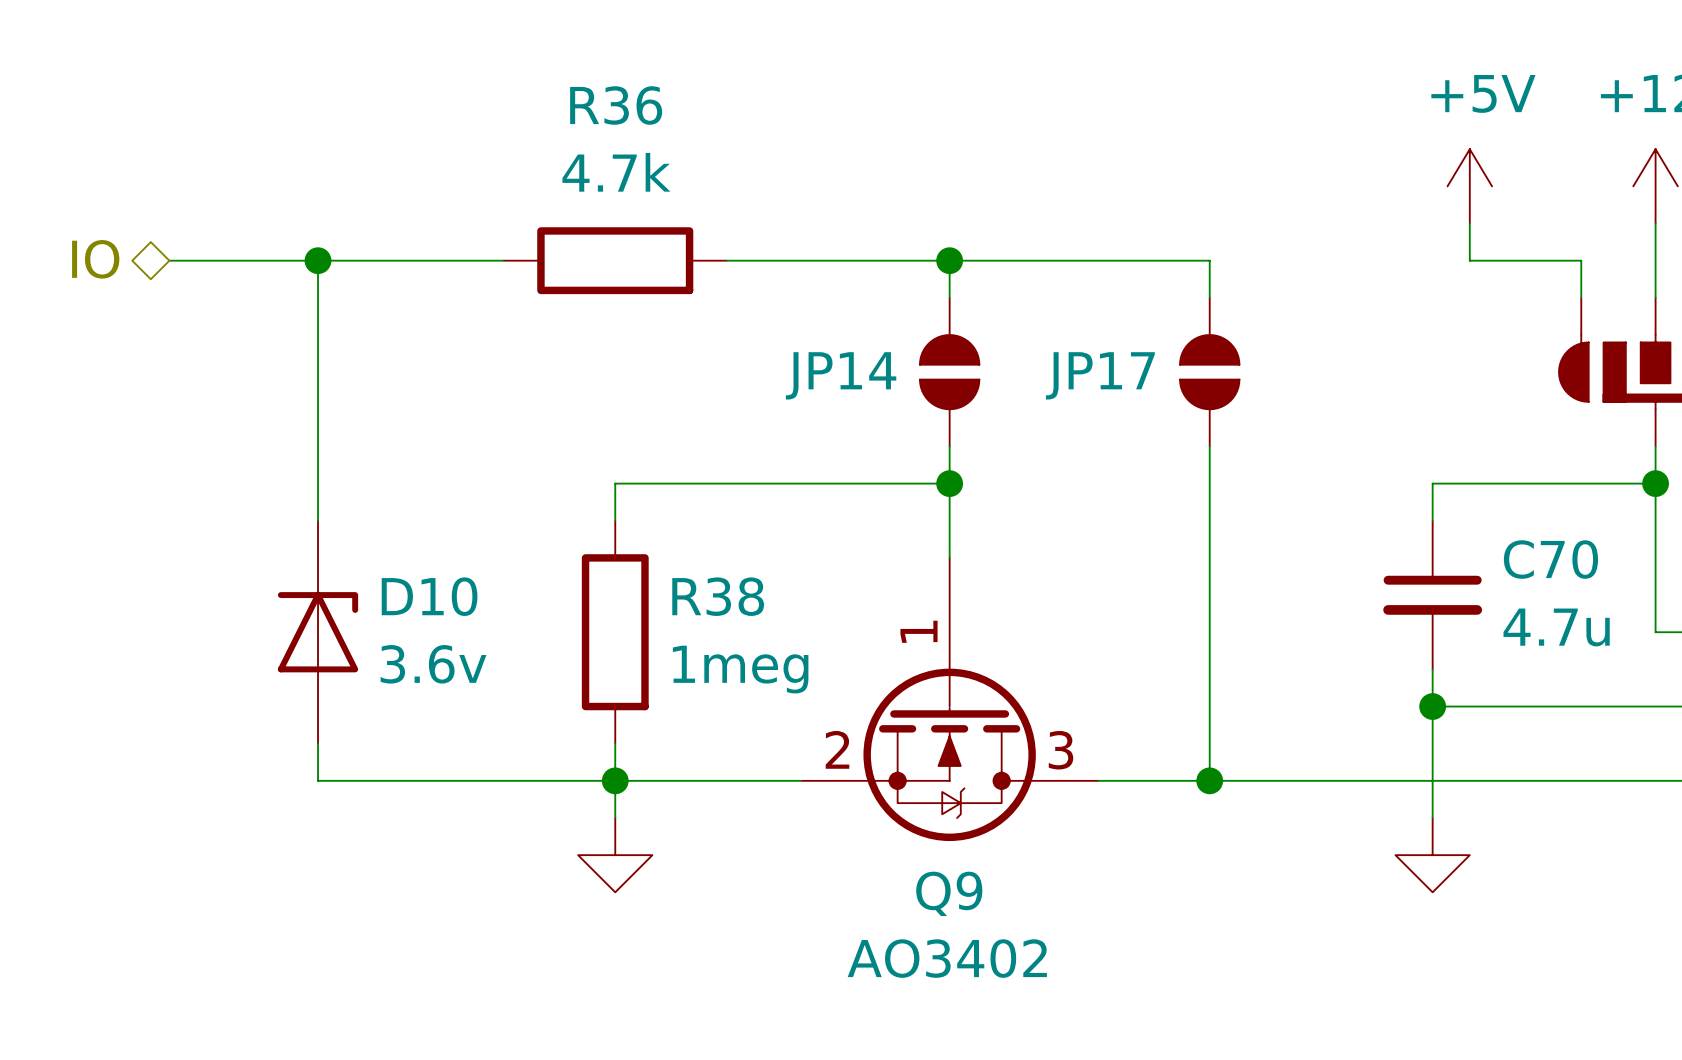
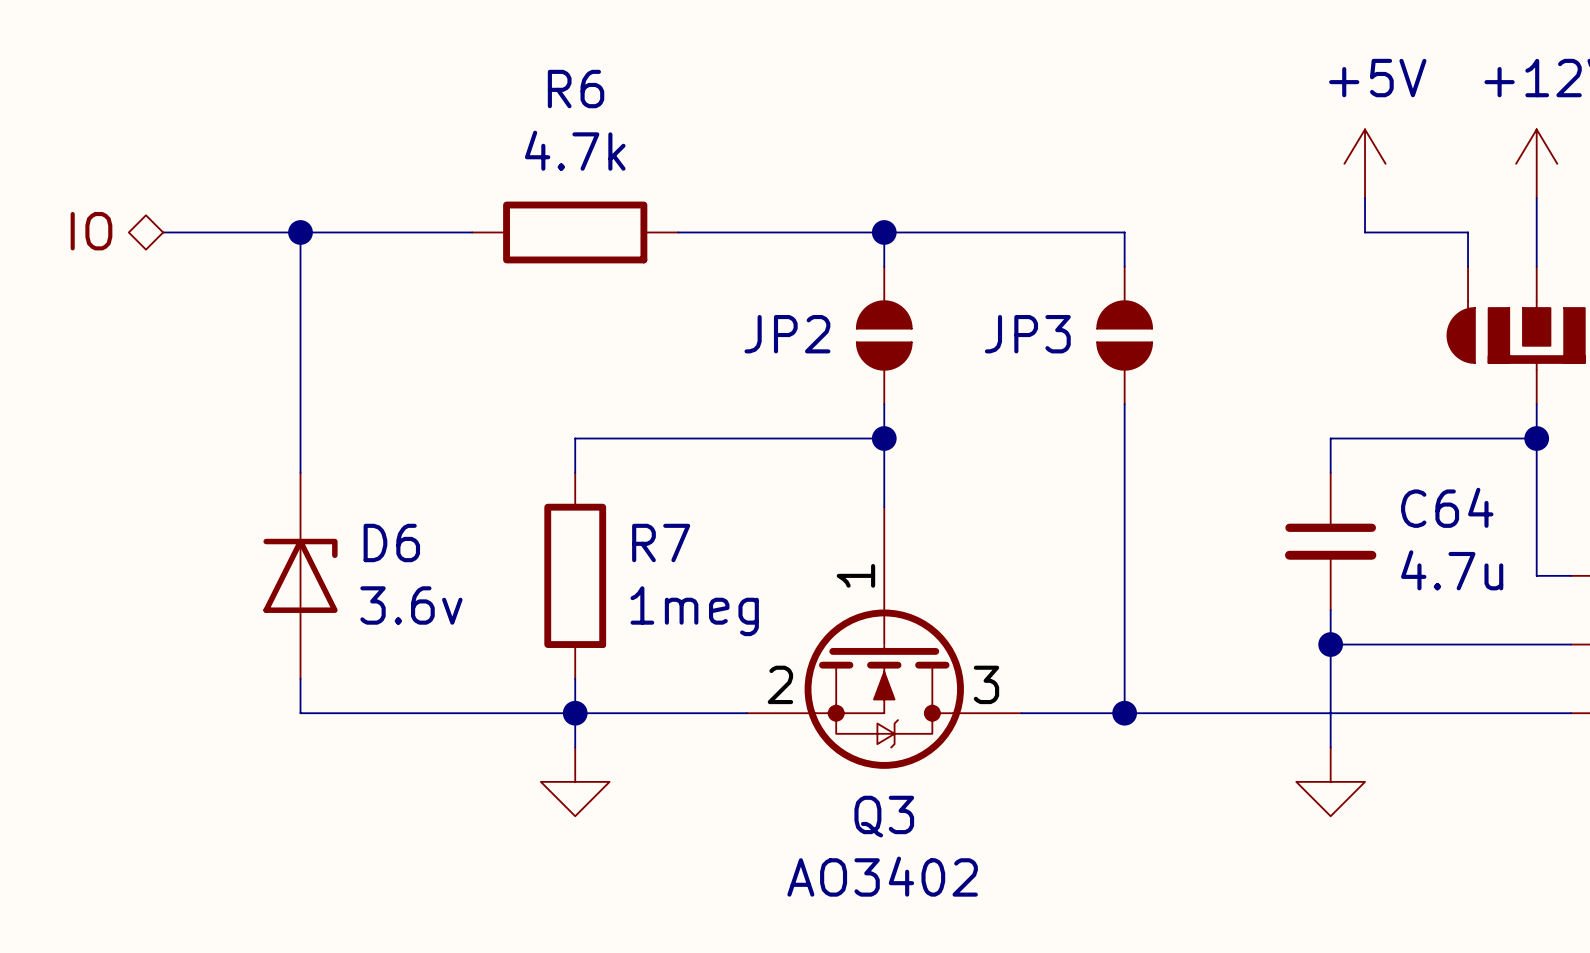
R36 name: R36 (616, 105) -> R6 (576, 89)
JP14 name: JP14 (841, 375) -> JP2 (787, 334)
JP17 name: JP17 (1100, 375) -> JP3 (1027, 334)
C70 name: C70 (1550, 559) -> C64 (1447, 507)
D10 name: D10 (429, 596) -> D6 (391, 542)
R38 name: R38 (718, 596) -> R7 (661, 542)
Q9 name: Q9 (949, 893) -> Q3 (884, 816)

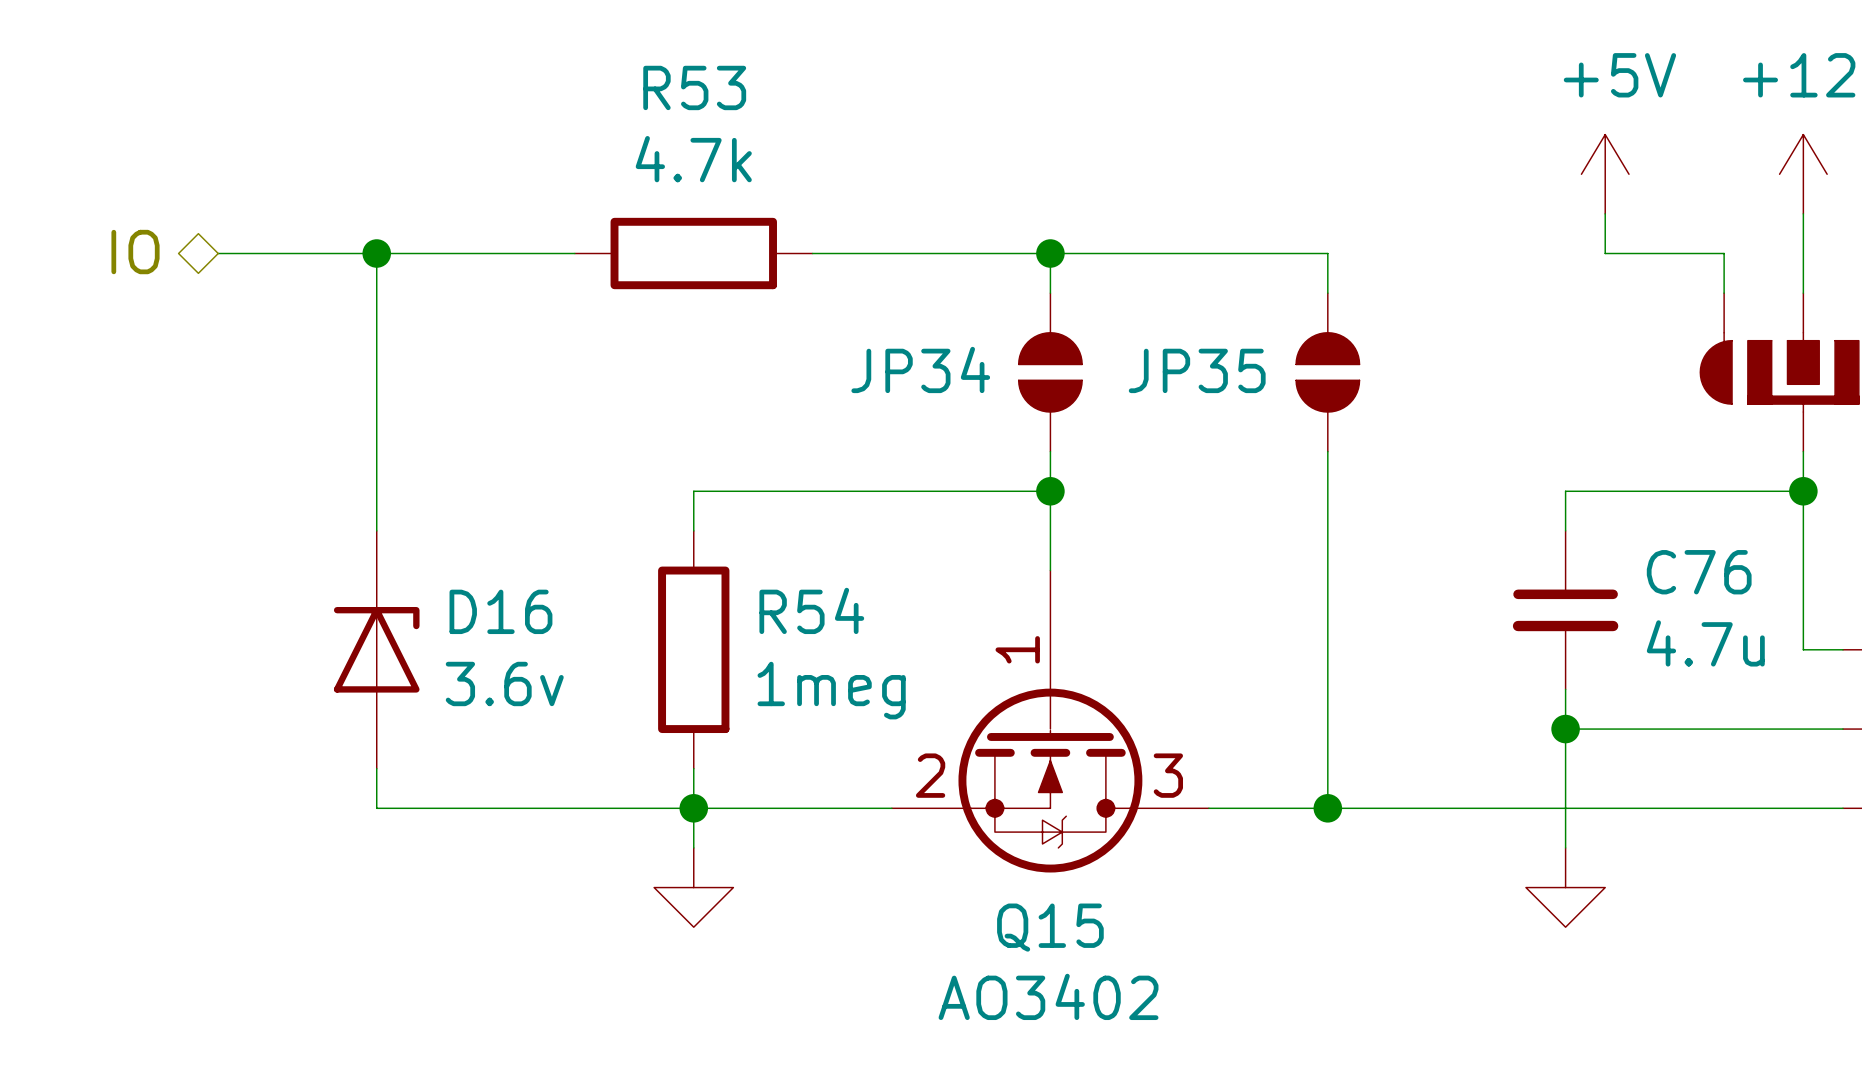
R6 name: R6 (576, 89) -> R53 (694, 87)
JP2 name: JP2 (787, 334) -> JP34 (920, 369)
JP3 name: JP3 (1027, 334) -> JP35 (1197, 370)
C64 name: C64 (1447, 507) -> C76 (1699, 572)
D6 name: D6 (391, 542) -> D16 (500, 611)
R7 name: R7 (661, 542) -> R54 (811, 610)
Q3 name: Q3 (884, 816) -> Q15 (1050, 927)

